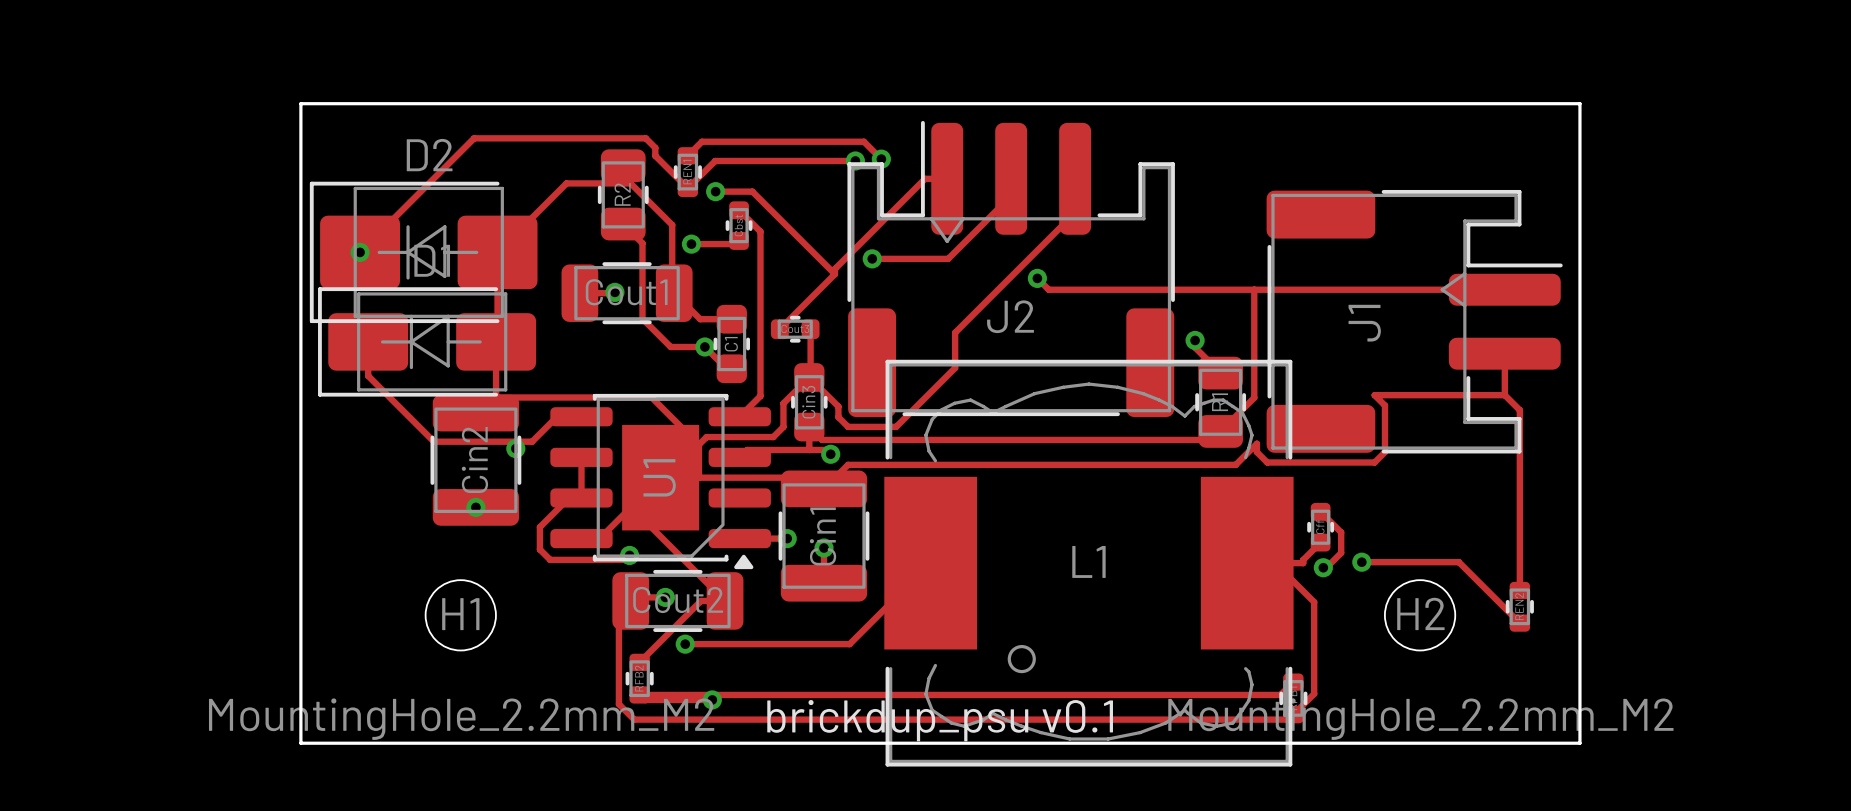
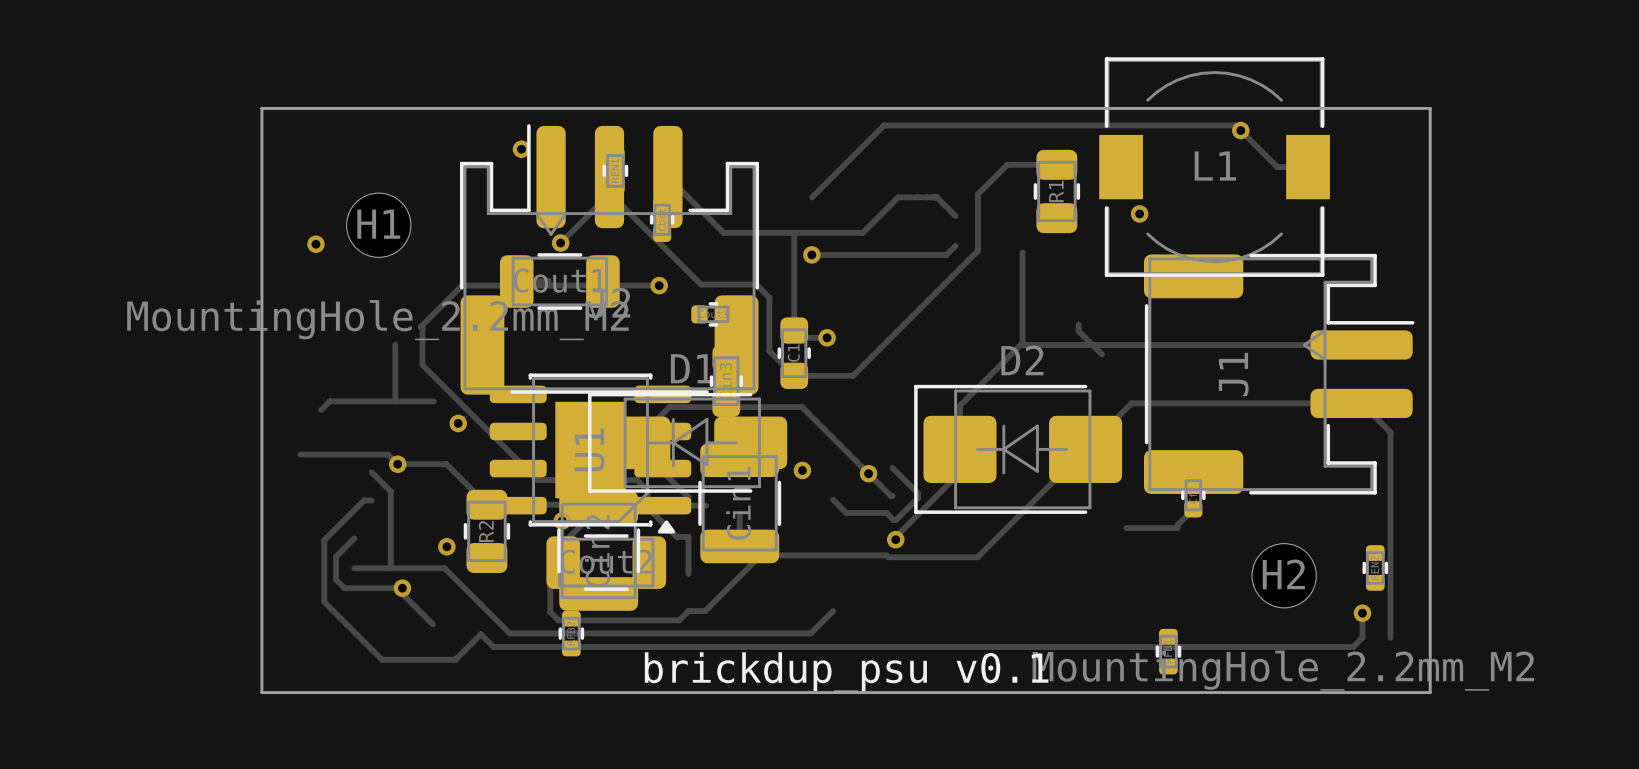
via: none -> (1240, 130)
via: none -> (521, 149)
track: (687, 155) (701, 141) (863, 141) (881, 159) -> none
via: (881, 159) -> none
track: (855, 160) (715, 160) (687, 188) (655, 155) (655, 147) (645, 138) (474, 138) (360, 252) -> none
via: (855, 160) -> none
track: none -> (1056, 164) (1007, 164) (977, 194) (977, 250) (853, 375) (794, 375) (769, 350) (769, 297) (756, 284) (701, 284) (609, 192) (609, 177)
track: none -> (1308, 167) (1277, 167) (1235, 125) (883, 125) (812, 197)
track: none -> (667, 177) (723, 232) (862, 232) (898, 197) (936, 197) (955, 216)
track: (947, 178) (925, 178) (834, 268) (834, 274) -> none
track: (1011, 178) (1011, 195) (948, 258) (872, 258) -> none
track: (1075, 178) (1075, 212) (955, 332) (955, 367) (896, 426) (848, 426) (838, 417) (838, 406) (809, 377) -> none
track: (715, 191) (752, 191) (834, 274) -> none
via: (715, 191) -> none
R2 position: (623, 194) -> (486, 531)
track: none -> (610, 193) (560, 243)
track: (739, 210) (760, 231) (760, 396) (739, 416) -> none
via: none -> (1139, 213)
track: (623, 224) (642, 243) (642, 318) (670, 346) (704, 346) (726, 368) (731, 368) -> none
track: none -> (794, 232) (794, 330) (801, 337) (827, 337)
track: (739, 240) (735, 244) (691, 244) -> none
via: (691, 244) -> none
via: none -> (560, 243)
D2 position: (423, 252) -> (1018, 449)
track: none -> (955, 245) (946, 254) (811, 254)
via position: (872, 258) -> (811, 254)
track: none -> (1022, 252) (1022, 345)
J2 position: (1011, 269) -> (609, 259)
track: (834, 274) (779, 329) -> none
track: (1037, 278) (1048, 289) (1504, 289) -> none
via: (1037, 278) -> none
track: (1254, 289) (1254, 397) (1212, 439) (822, 439) (809, 427) (809, 449) -> none
via: (614, 292) -> none
track: none -> (659, 285) (462, 285) (420, 326) (422, 328) (422, 365) (537, 480) (636, 480) (647, 490) (647, 507) (676, 536) (688, 536) (688, 573)
via: none -> (659, 285)
track: (731, 319) (700, 319) (672, 291) (672, 224) (630, 183) (566, 183) (497, 252) (496, 397) -> none
J1 position: (1414, 321) -> (1279, 374)
track: (810, 329) (810, 376) (783, 403) (783, 426) (773, 437) (706, 437) (698, 444) (651, 397) (491, 397) (475, 413) -> none
via: (1195, 340) -> none
track: (368, 341) (368, 375) (433, 441) (532, 441) (557, 416) (581, 416) -> none
D1 position: (427, 341) -> (687, 442)
C1 position: (731, 344) -> (794, 353)
via: (704, 346) -> none
track: (1504, 353) (1504, 395) -> none
via: none -> (827, 337)
L1 footprint: [884, 359, 1294, 767] -> [1099, 57, 1330, 277]
track: none -> (395, 344) (395, 401)
track: none -> (1361, 345) (1020, 345) (959, 405) (959, 472) (895, 536) (895, 539)
track: (1504, 395) (1374, 395) (1384, 405) (1384, 452) (1374, 462) (1267, 462) (1256, 452) (1256, 443) (1235, 464) (848, 464) (823, 488) (812, 477) (660, 477) (599, 538) (581, 538) -> none
track: (1504, 395) (1519, 410) (1519, 590) -> none
R1 position: (1220, 402) -> (1056, 191)
track: none -> (433, 401) (329, 401) (321, 409)
track: (830, 454) (826, 449) (747, 449) (739, 457) -> none
via: (830, 454) -> none
track: (581, 457) (581, 497) (569, 497) (539, 527) (539, 549) (550, 559) (625, 559) (629, 555) -> none
Cin2 position: (475, 460) -> (598, 550)
track: none -> (300, 454) (388, 454) (397, 464) (446, 464) (486, 504) (595, 504) (598, 507) (550, 556) (550, 612) (558, 620) (679, 620) (688, 611) (705, 611) (760, 555) (977, 557) (1131, 403) (1361, 403) (1390, 432) (1390, 637)
track: none -> (892, 467) (917, 493) (917, 498) (896, 520) (886, 512) (846, 512) (833, 499)
via: none -> (802, 470)
track: none -> (371, 472) (390, 491) (390, 568)
via: none -> (868, 473)
via position: (475, 507) -> (397, 464)
track: (631, 507) (725, 600) (701, 600) (639, 662) -> none
track: (1320, 511) (1341, 532) (1341, 552) (1326, 567) (1323, 567) -> none
track: none -> (892, 495) (801, 407) (669, 407) (633, 442) (688, 497) (688, 499)
track: none -> (371, 500) (364, 500) (324, 540) (324, 601) (382, 659) (455, 659) (480, 634) (493, 647) (1353, 647) (1362, 637) (1362, 613)
via: (787, 538) -> none
via: (823, 548) -> none
track: (1361, 562) (1458, 562) (1519, 623) -> none
via: (1361, 562) -> none
track: (930, 563) (849, 644) (685, 644) -> none
track: (1275, 563) (1314, 602) (1314, 693) (1288, 719) (634, 719) (618, 704) (618, 612) (634, 597) (665, 597) -> none
via: (1323, 567) -> none
track: none -> (354, 538) (336, 556) (336, 579) (344, 588) (402, 588) (402, 593) (432, 624)
via: none -> (895, 539)
via: none -> (446, 546)
via: (665, 597) -> none
track: none -> (354, 568) (444, 568) (509, 633) (810, 633) (833, 611)
H1 position: (460, 615) -> (378, 225)
via: none -> (402, 588)
via: (685, 644) -> none
via: none -> (1362, 613)
track: (1293, 682) (1280, 694) (639, 694) (644, 699) (712, 699) -> none
via: (712, 699) -> none

